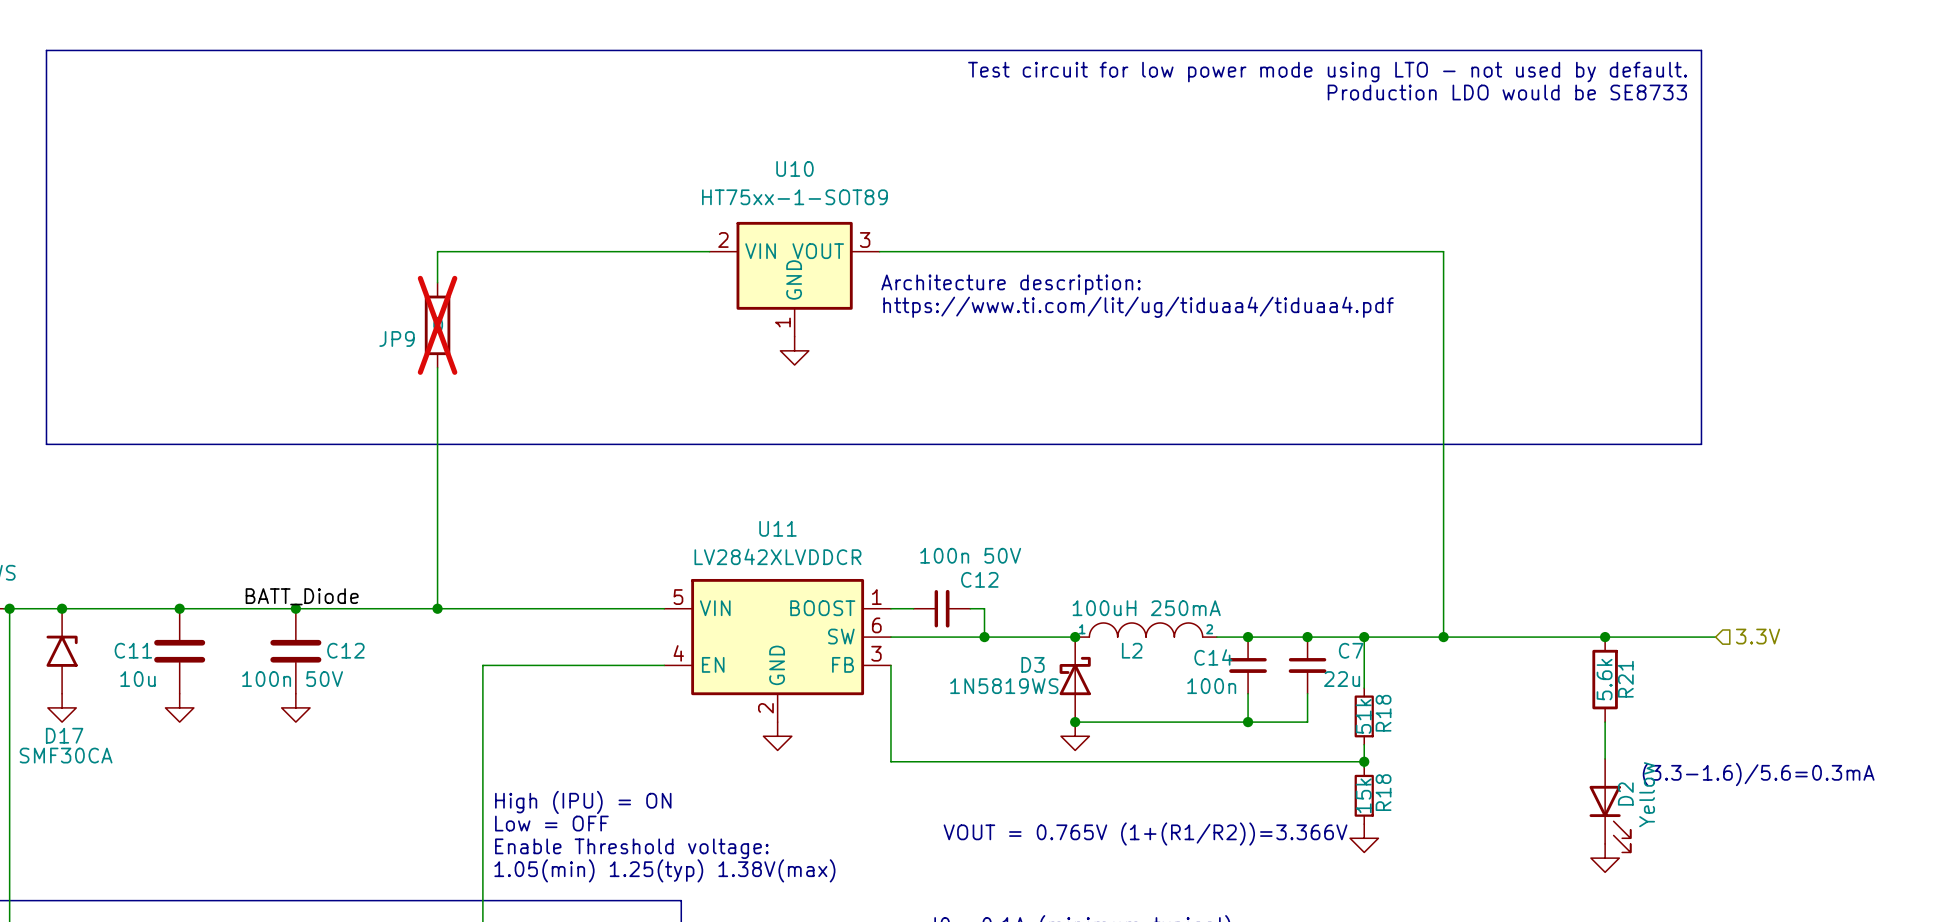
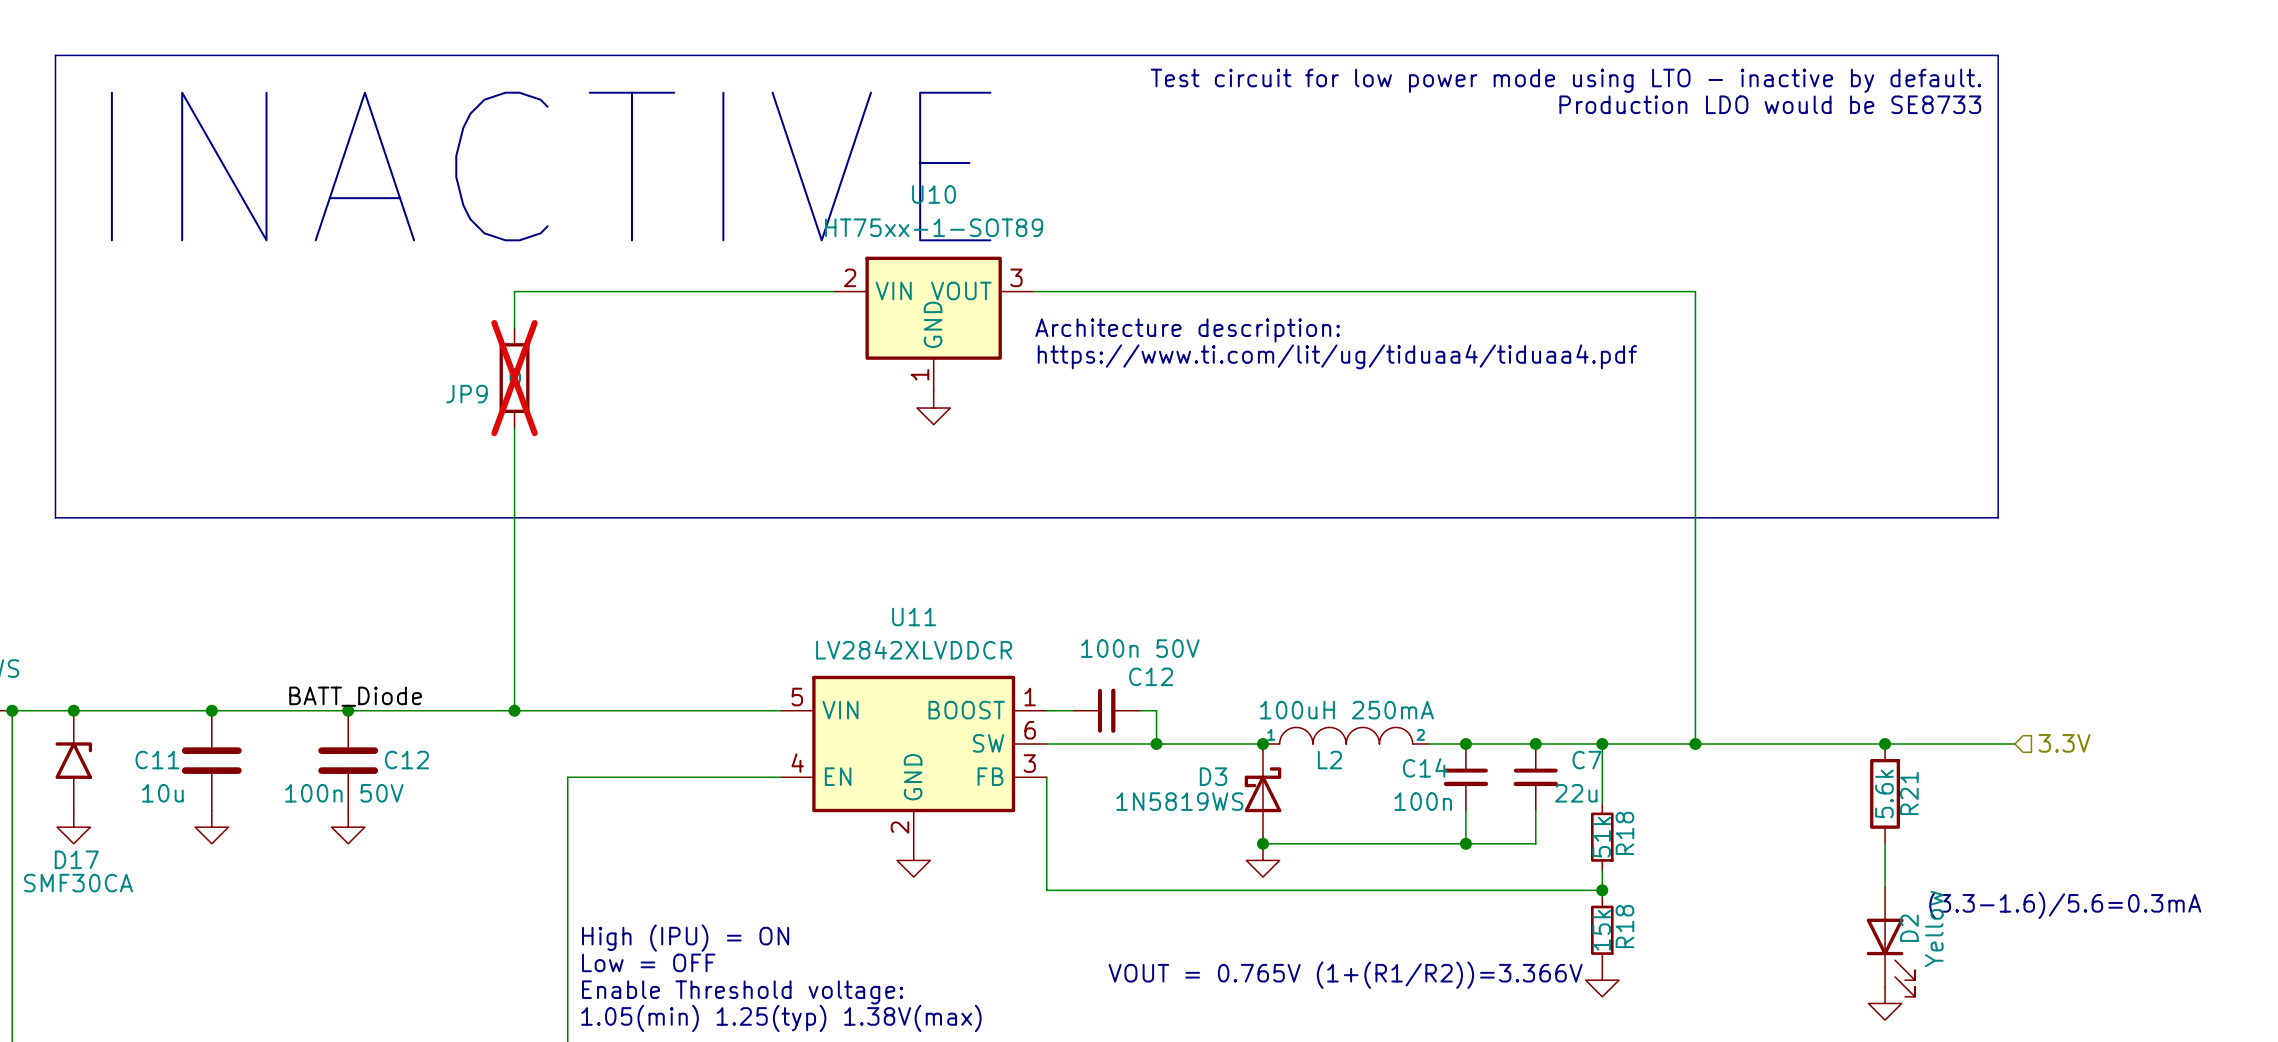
text: Test circuit for low power mode using LTO - not used by default. (1327, 72) -> Test circuit for low power mode using LTO - inactive by default. (1565, 80)
text: none -> INACTIVE (551, 166)

